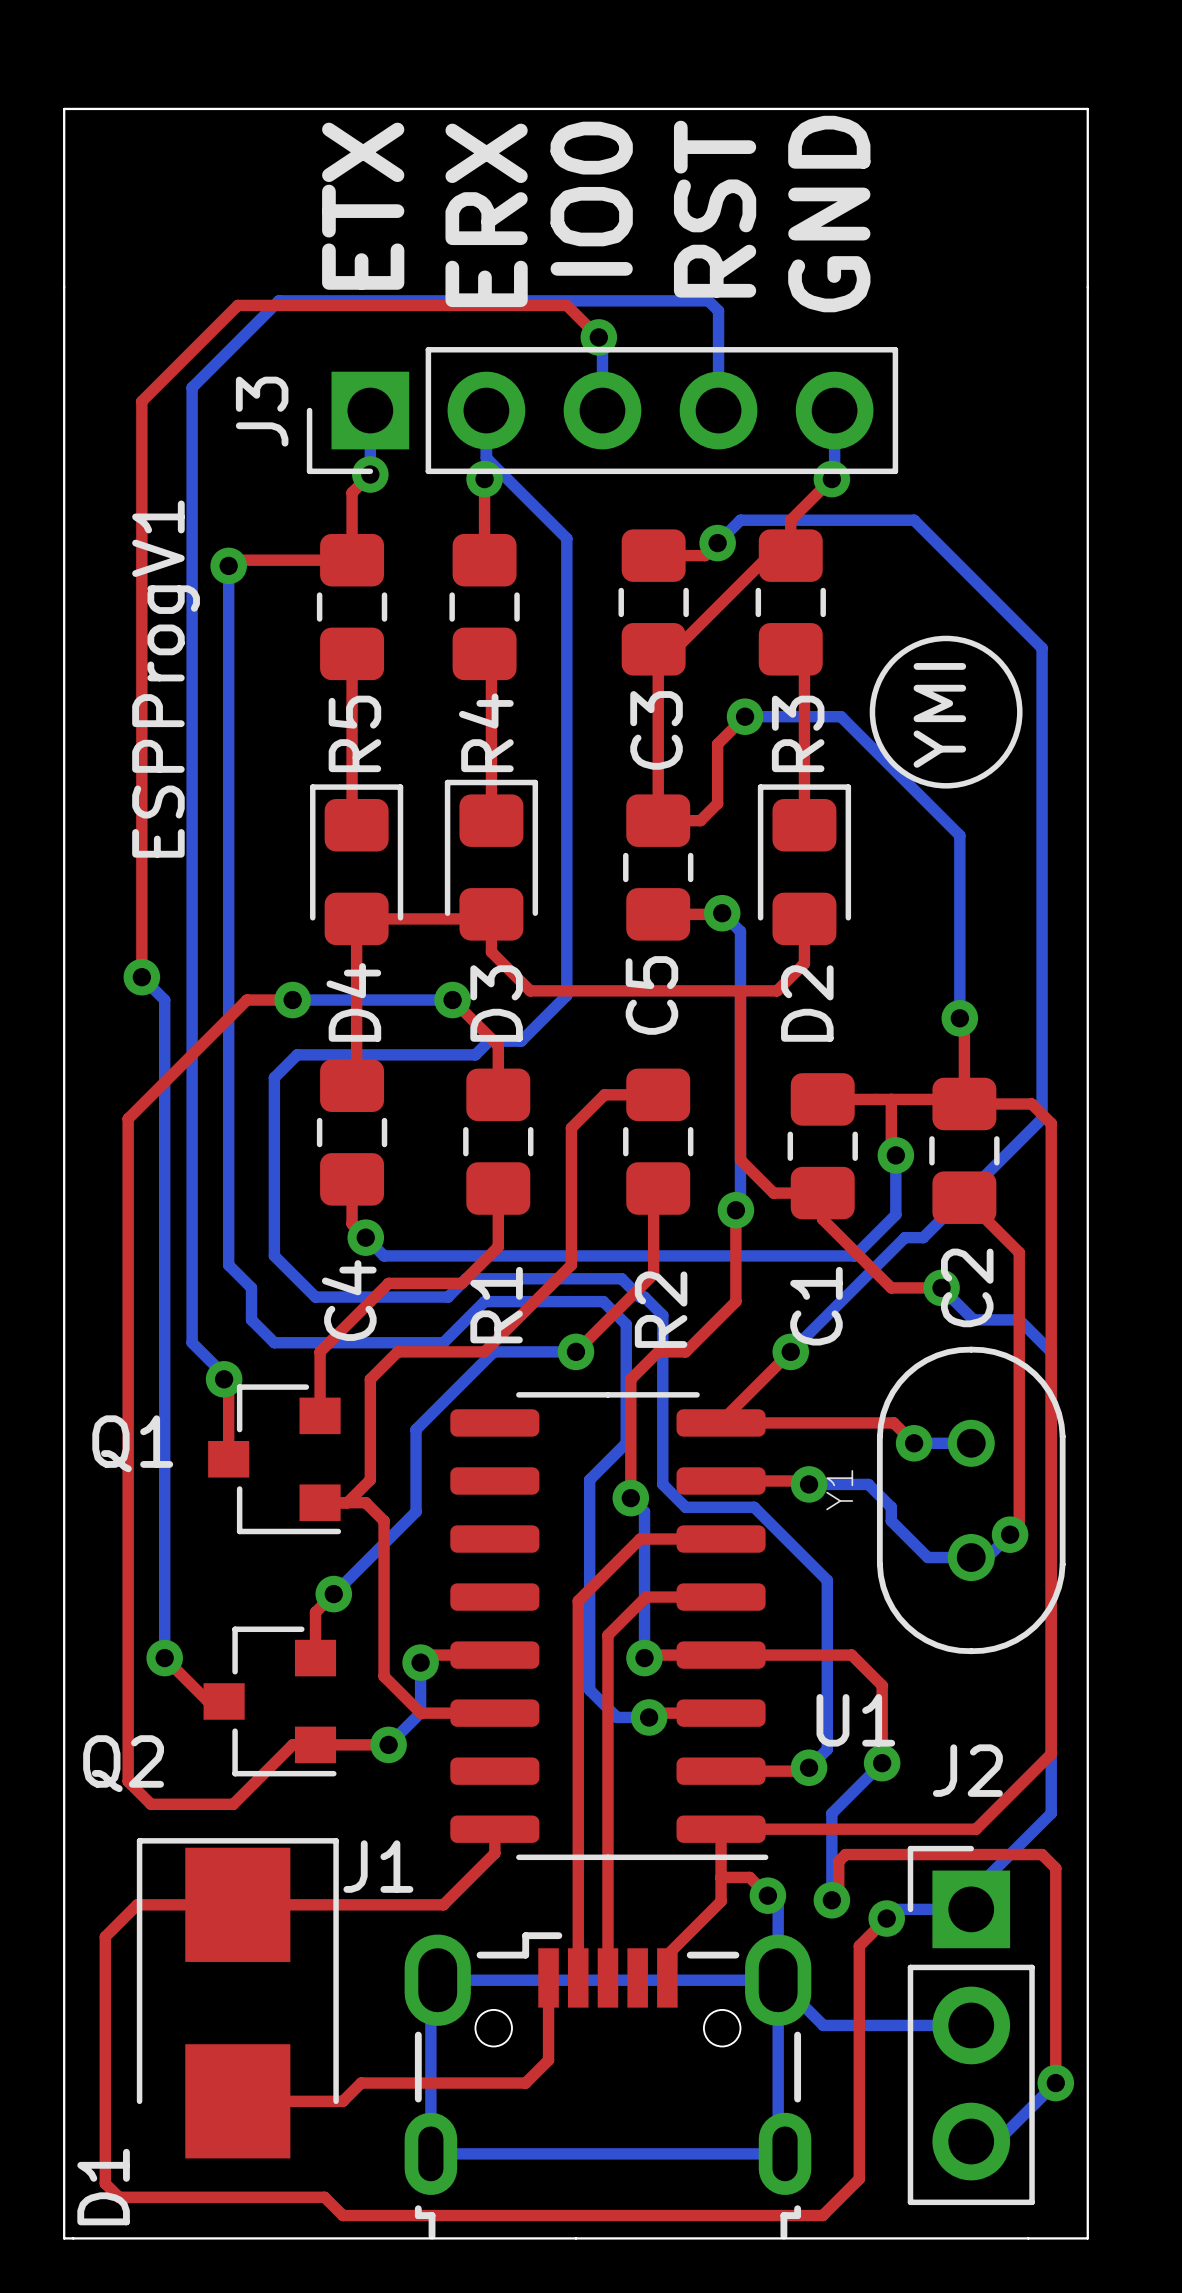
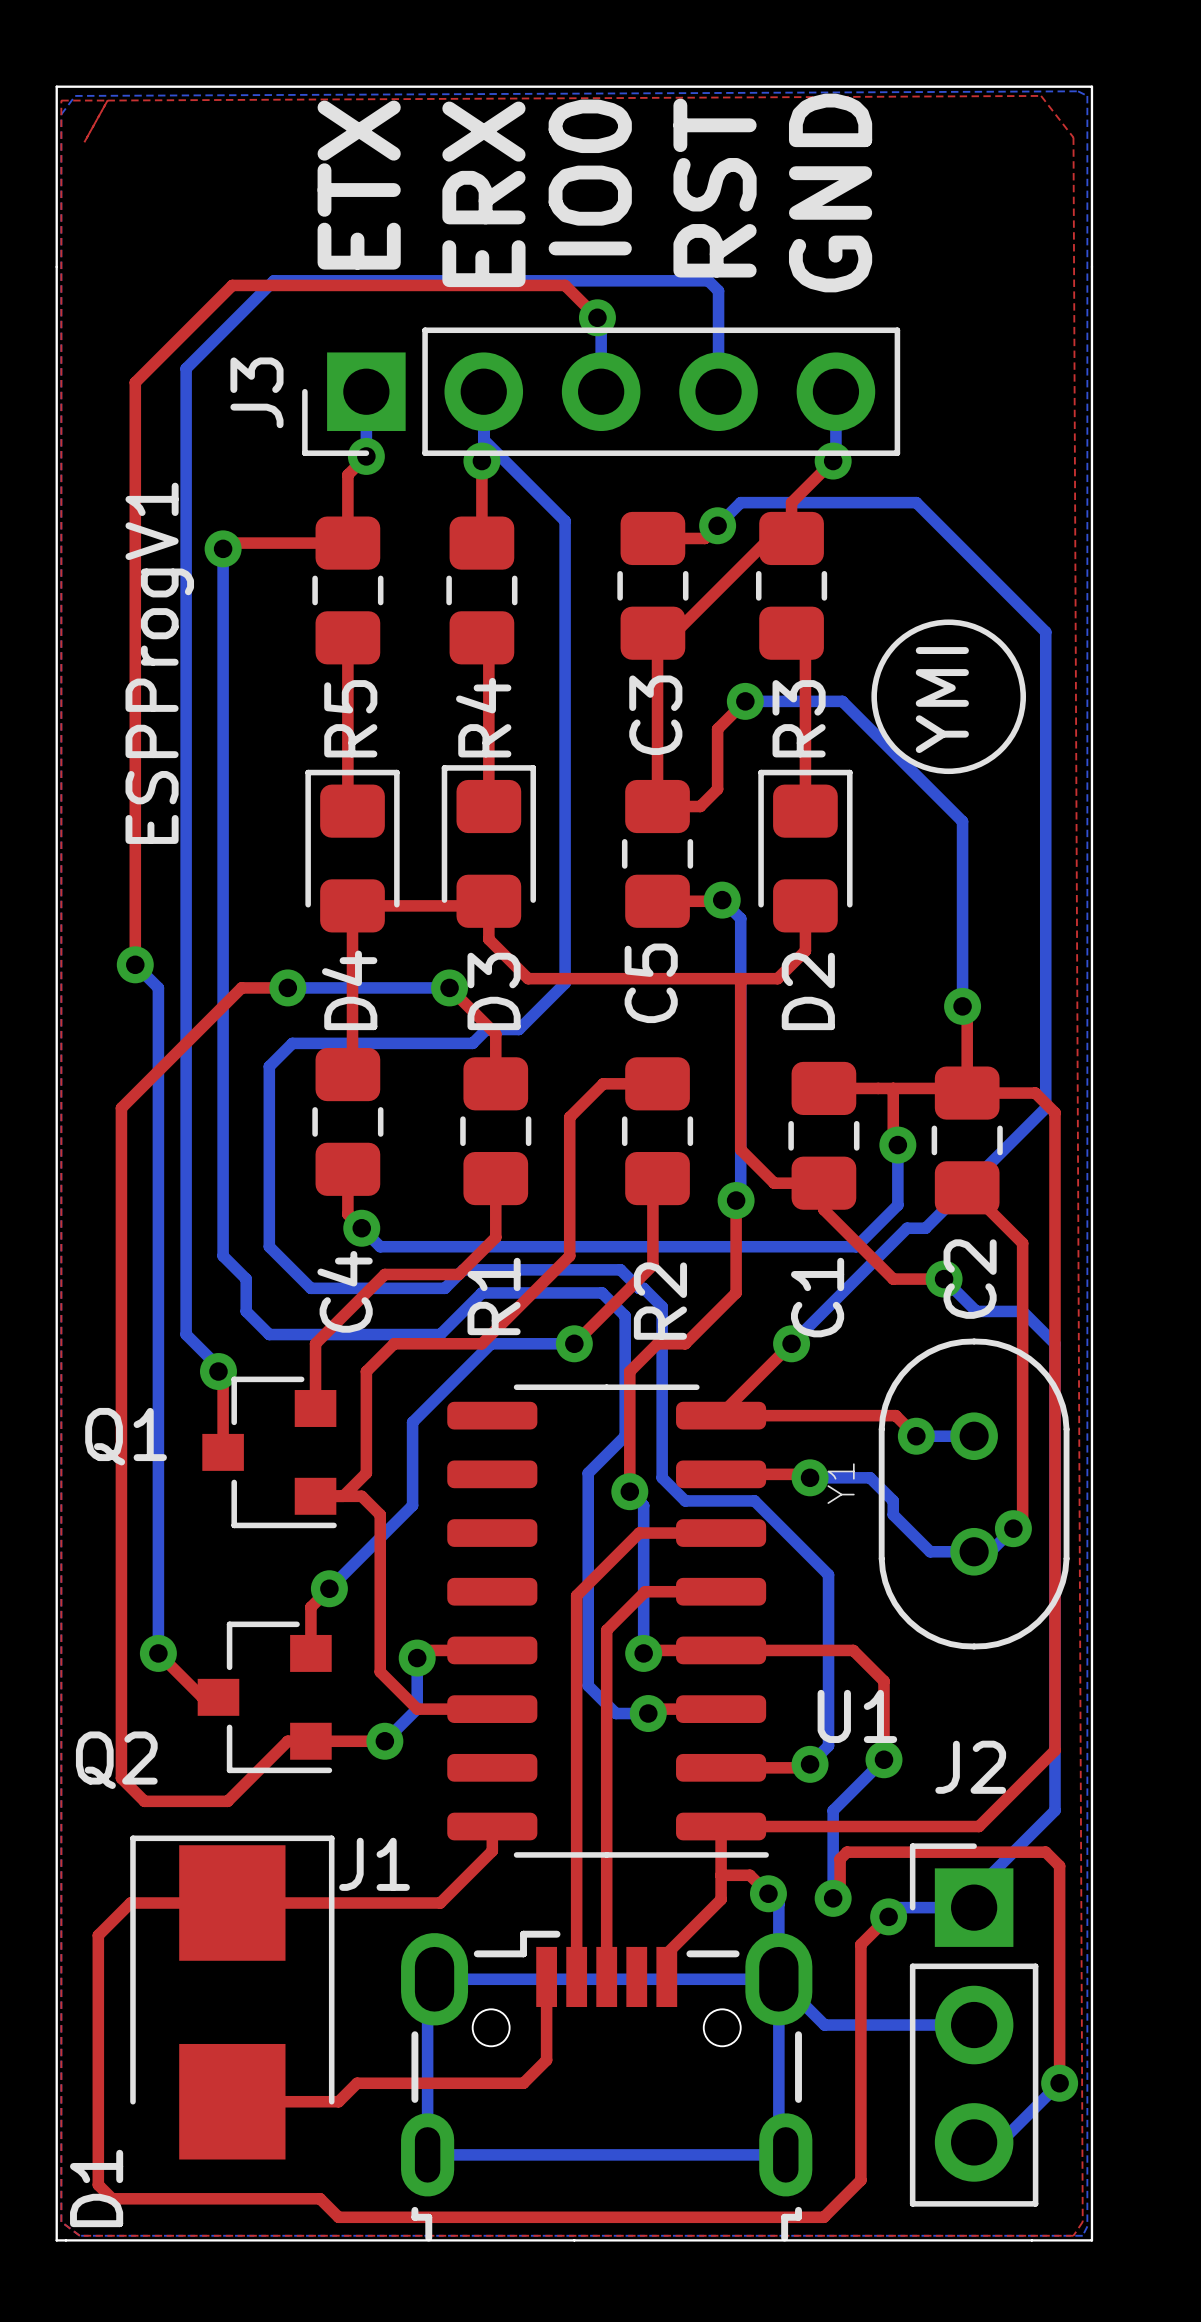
bottom zone outline: none -> (1078, 91) (75, 95) (61, 114) (61, 2221) (79, 2235) (1082, 2235) (1087, 2226) (1087, 95) (1078, 91)
top zone outline: none -> (107, 100) (84, 142)
top zone outline: none -> (107, 100) (1041, 95) (1073, 137) (1082, 2221) (1073, 2235) (79, 2235) (61, 2221) (61, 100) (107, 100)

